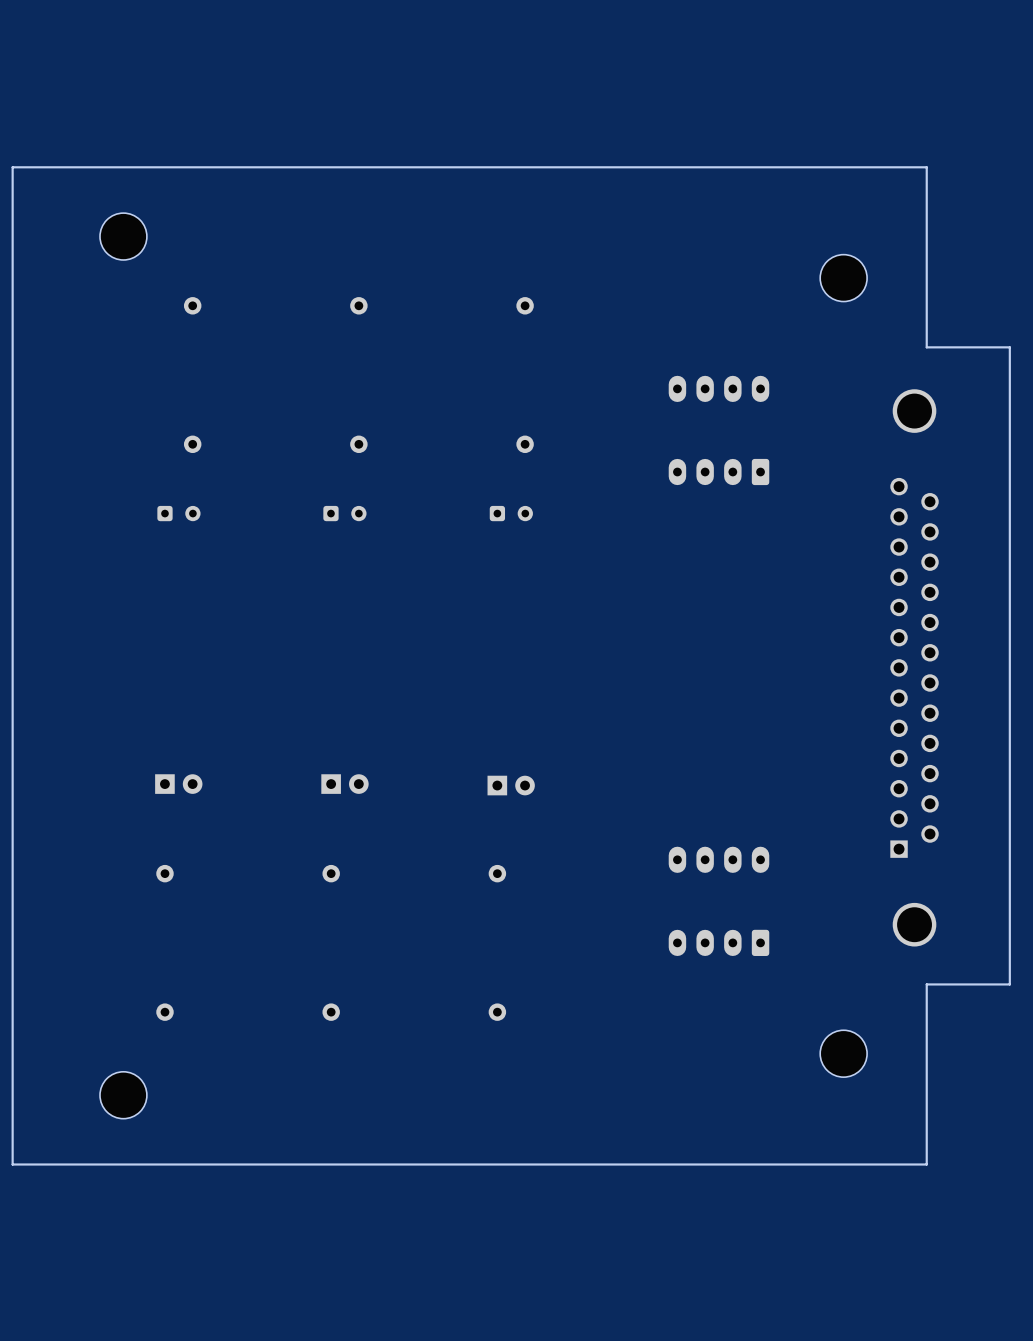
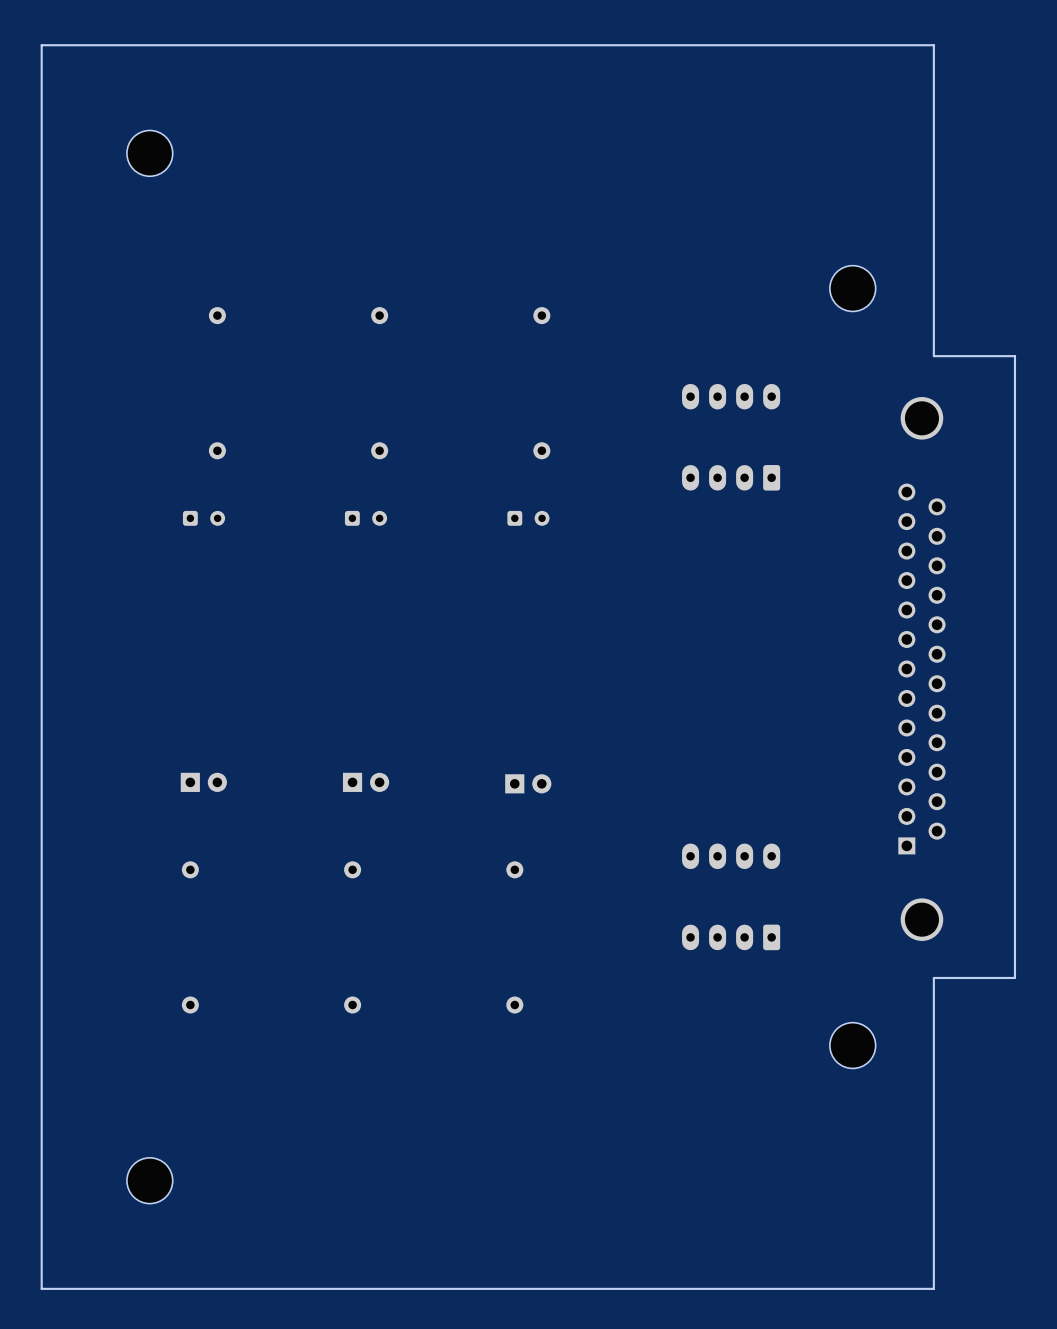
board edge: (926, 167) (12, 167) -> (933, 180) (933, 45) (41, 45) (41, 180)
part position: (123, 236) -> (149, 153)
part position: (123, 1095) -> (149, 1180)
board edge: (926, 1164) (12, 1164) -> (933, 1153) (933, 1288) (41, 1288) (41, 1153)

